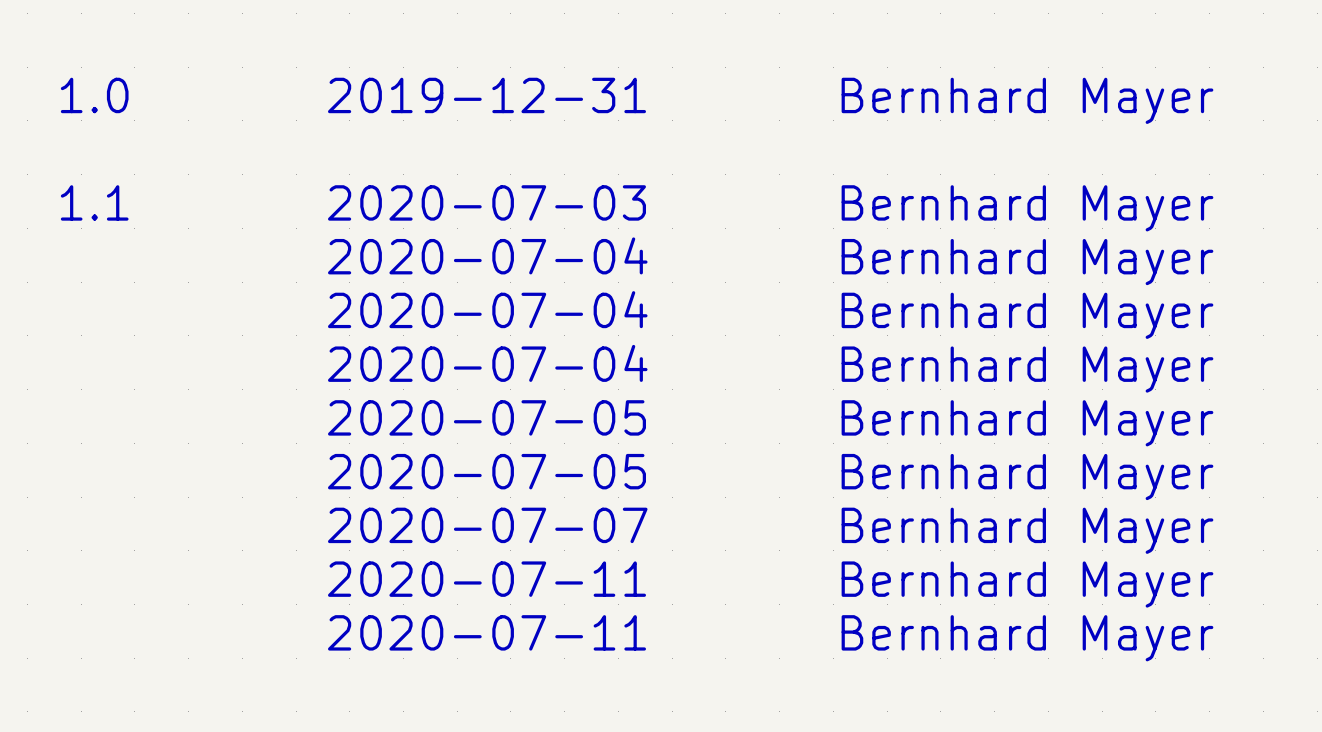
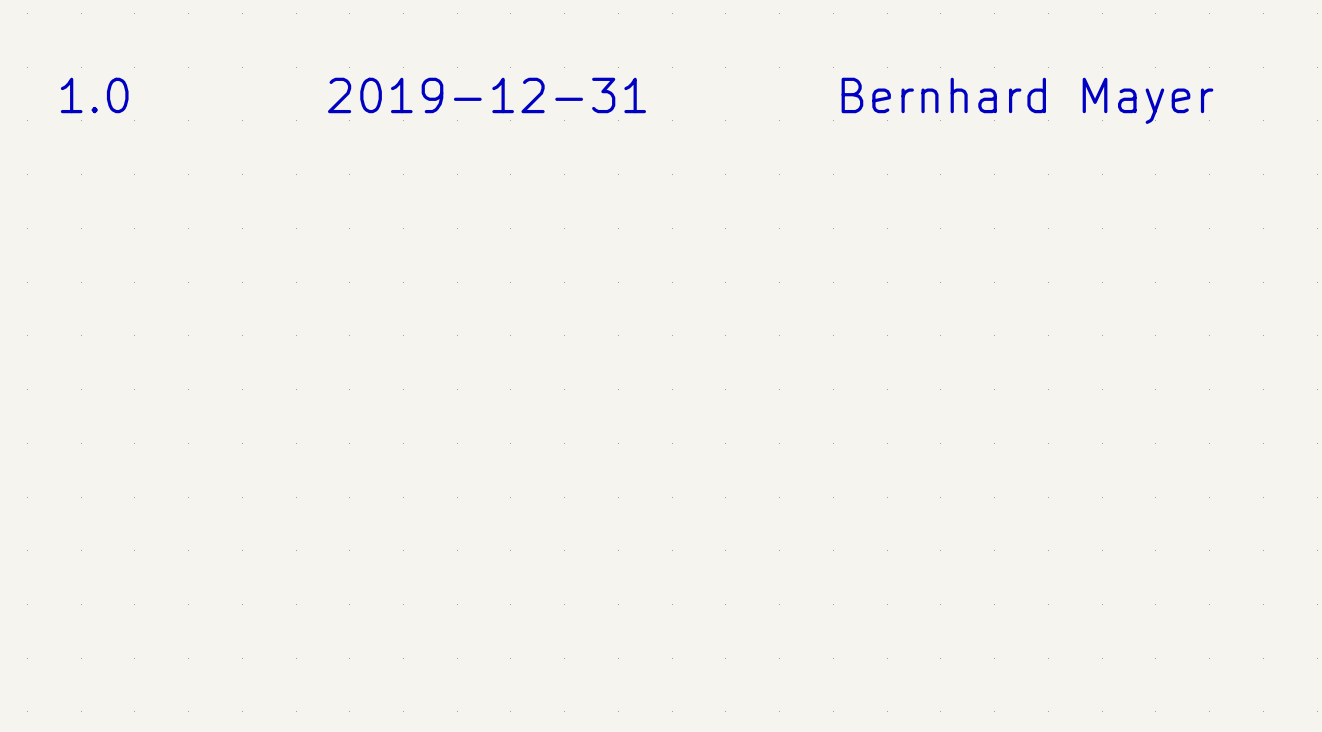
text: 1.1 (94, 202) -> none
text: 2020-07-03 (487, 202) -> none
text: Bernhard Mayer (1027, 208) -> none
text: 2020-07-04 (487, 255) -> none
text: Bernhard Mayer (1027, 262) -> none
text: 2020-07-04 (487, 309) -> none
text: Bernhard Mayer (1027, 315) -> none
text: 2020-07-04 (487, 363) -> none
text: Bernhard Mayer (1027, 369) -> none
text: 2020-07-05 (487, 417) -> none
text: Bernhard Mayer (1027, 423) -> none
text: 2020-07-05 (487, 471) -> none
text: Bernhard Mayer (1027, 477) -> none
text: 2020-07-07 (487, 525) -> none
text: Bernhard Mayer (1027, 530) -> none
text: 2020-07-11 (487, 579) -> none
text: Bernhard Mayer (1027, 584) -> none
text: 2020-07-11 (487, 632) -> none
text: Bernhard Mayer (1027, 638) -> none

